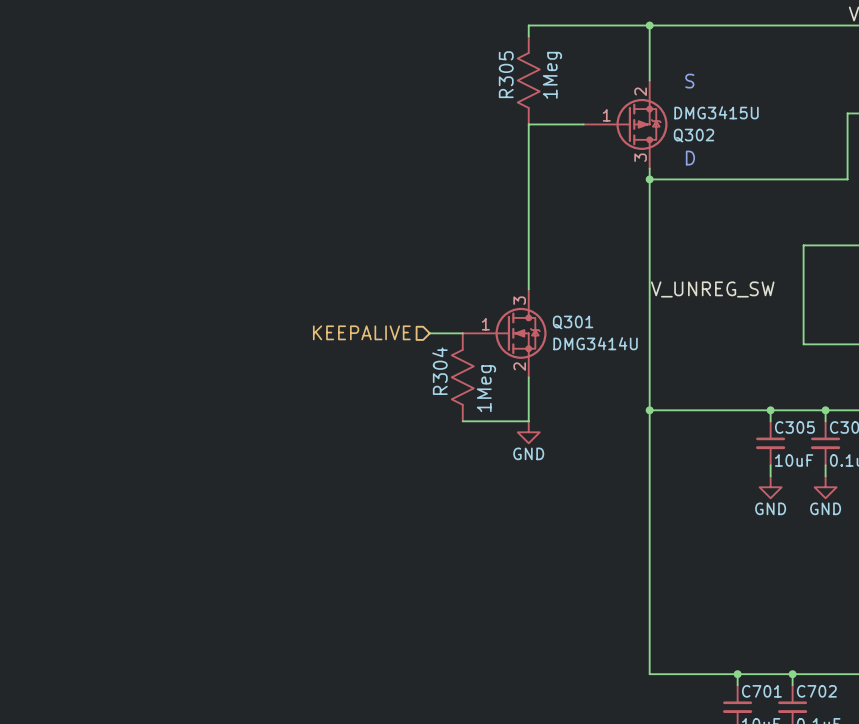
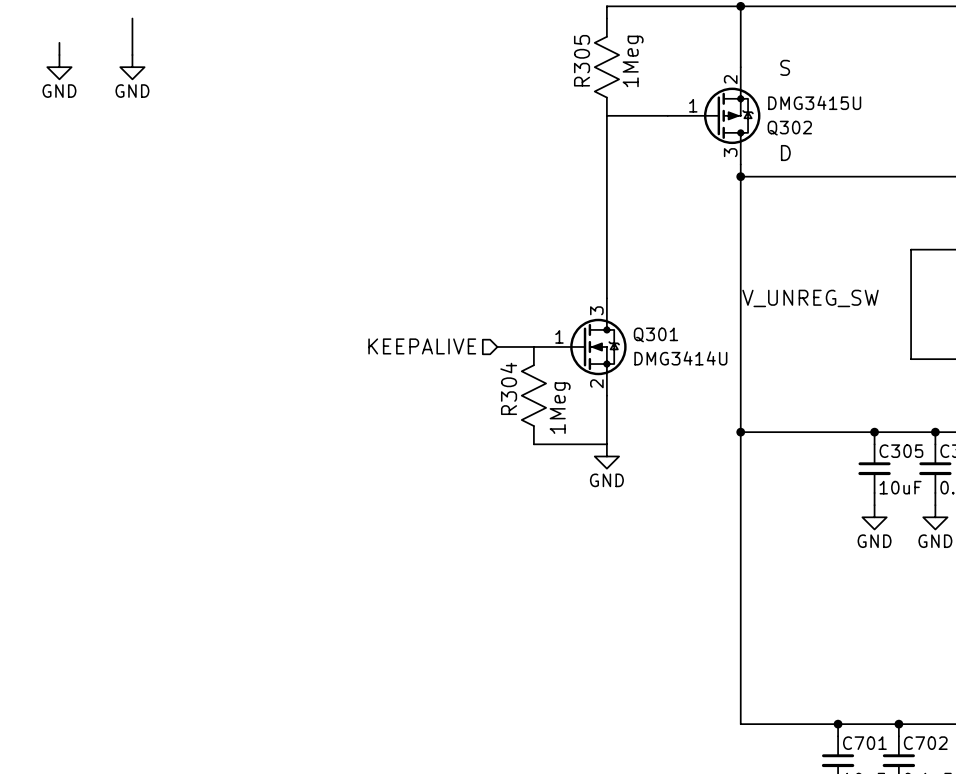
wire: none -> (132, 18) (132, 55)
wire: none -> (59, 42) (59, 55)
power symbol: none -> GND (59, 67)
power symbol: none -> GND (132, 67)

